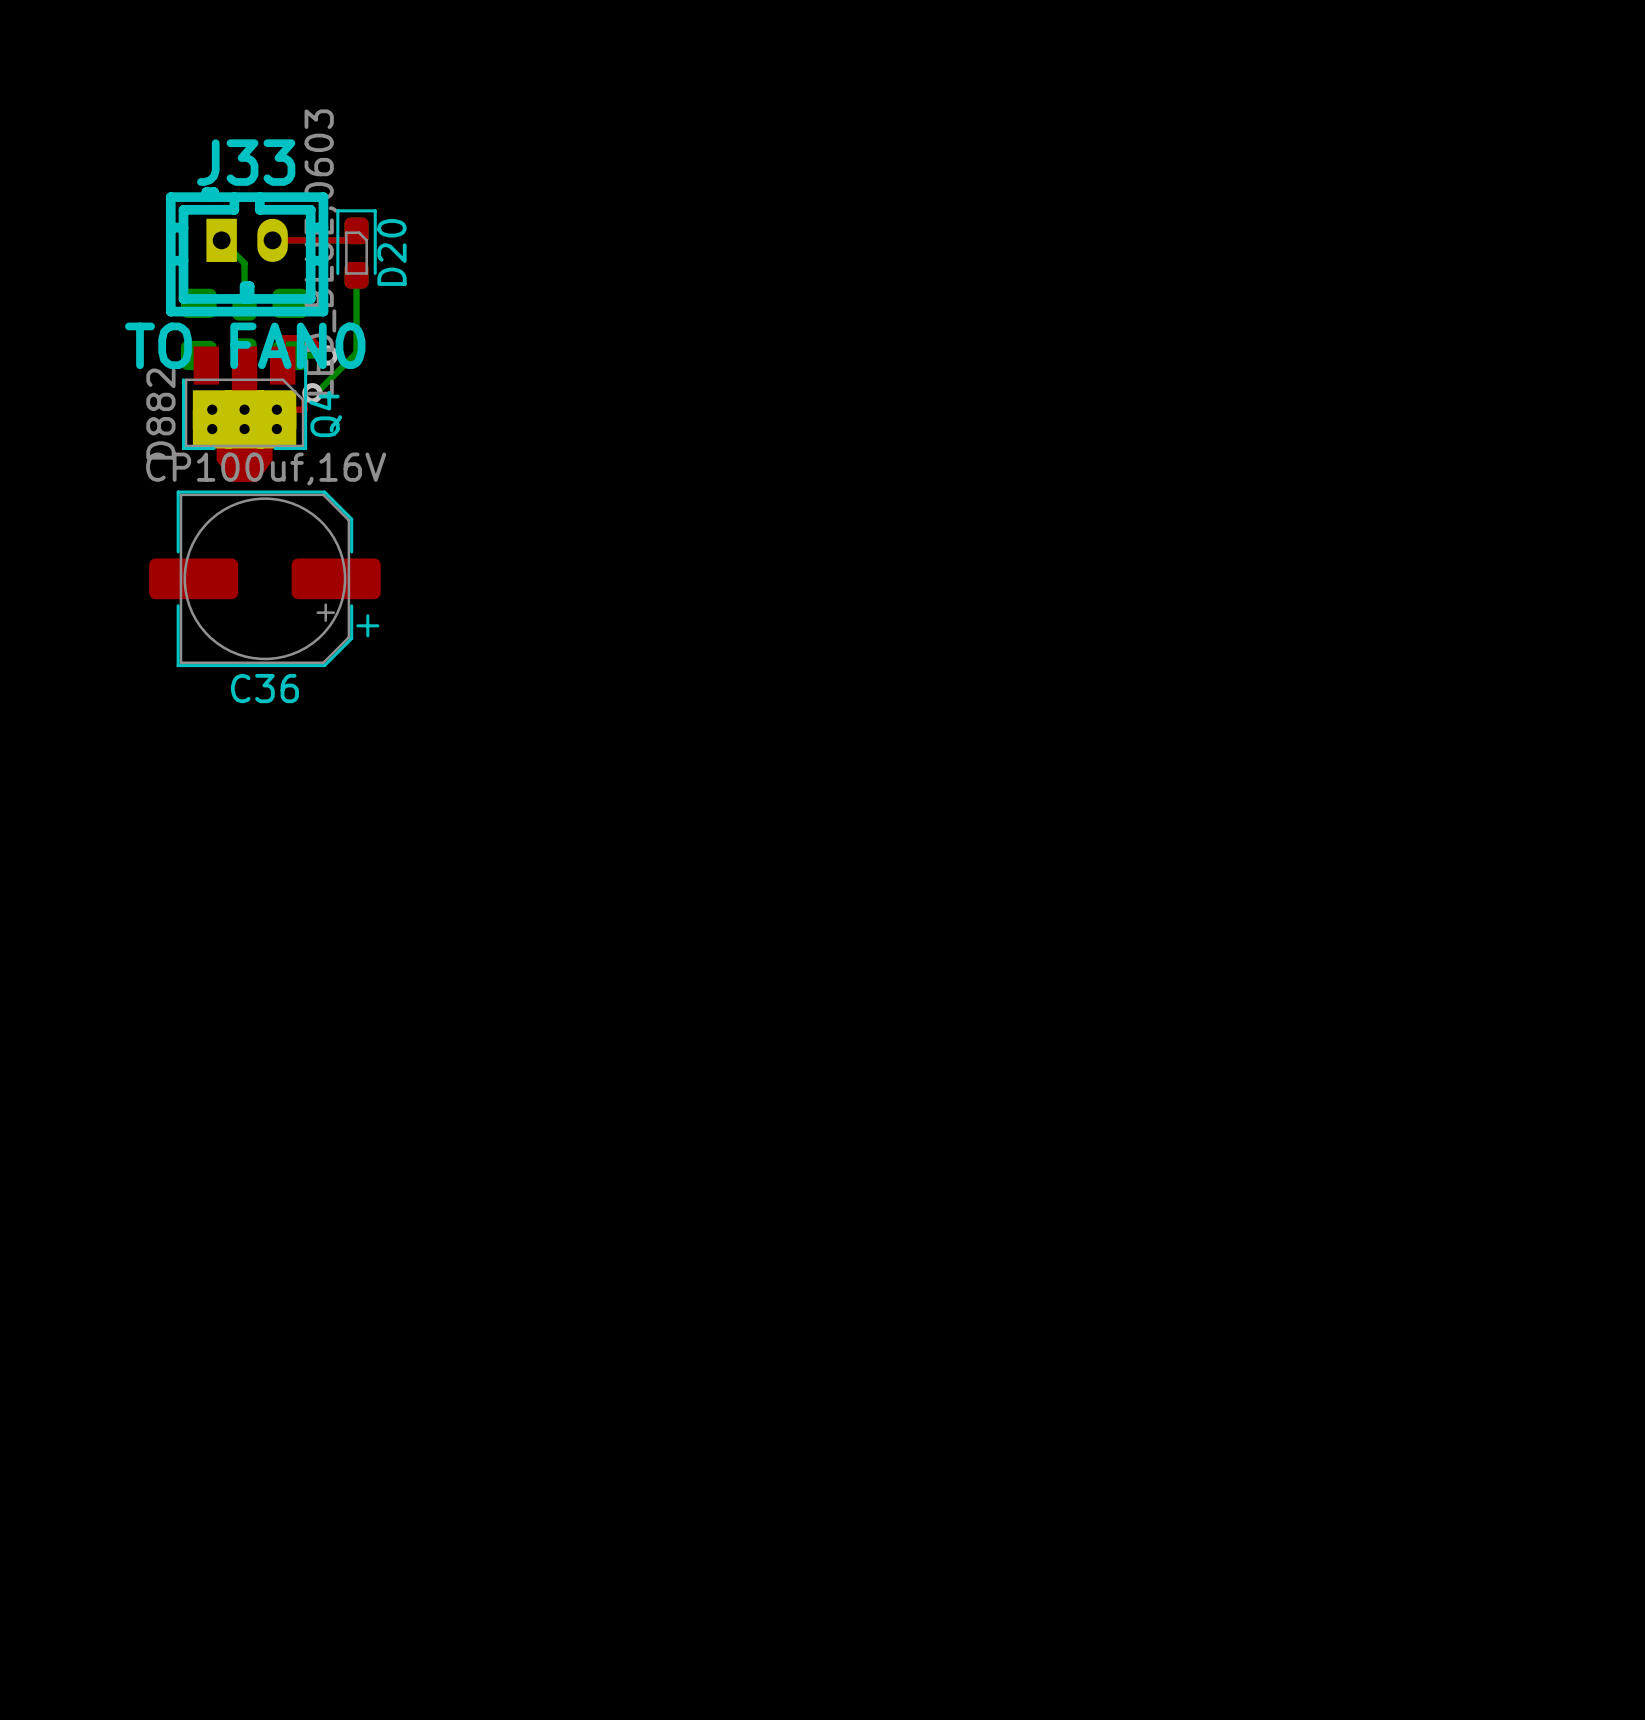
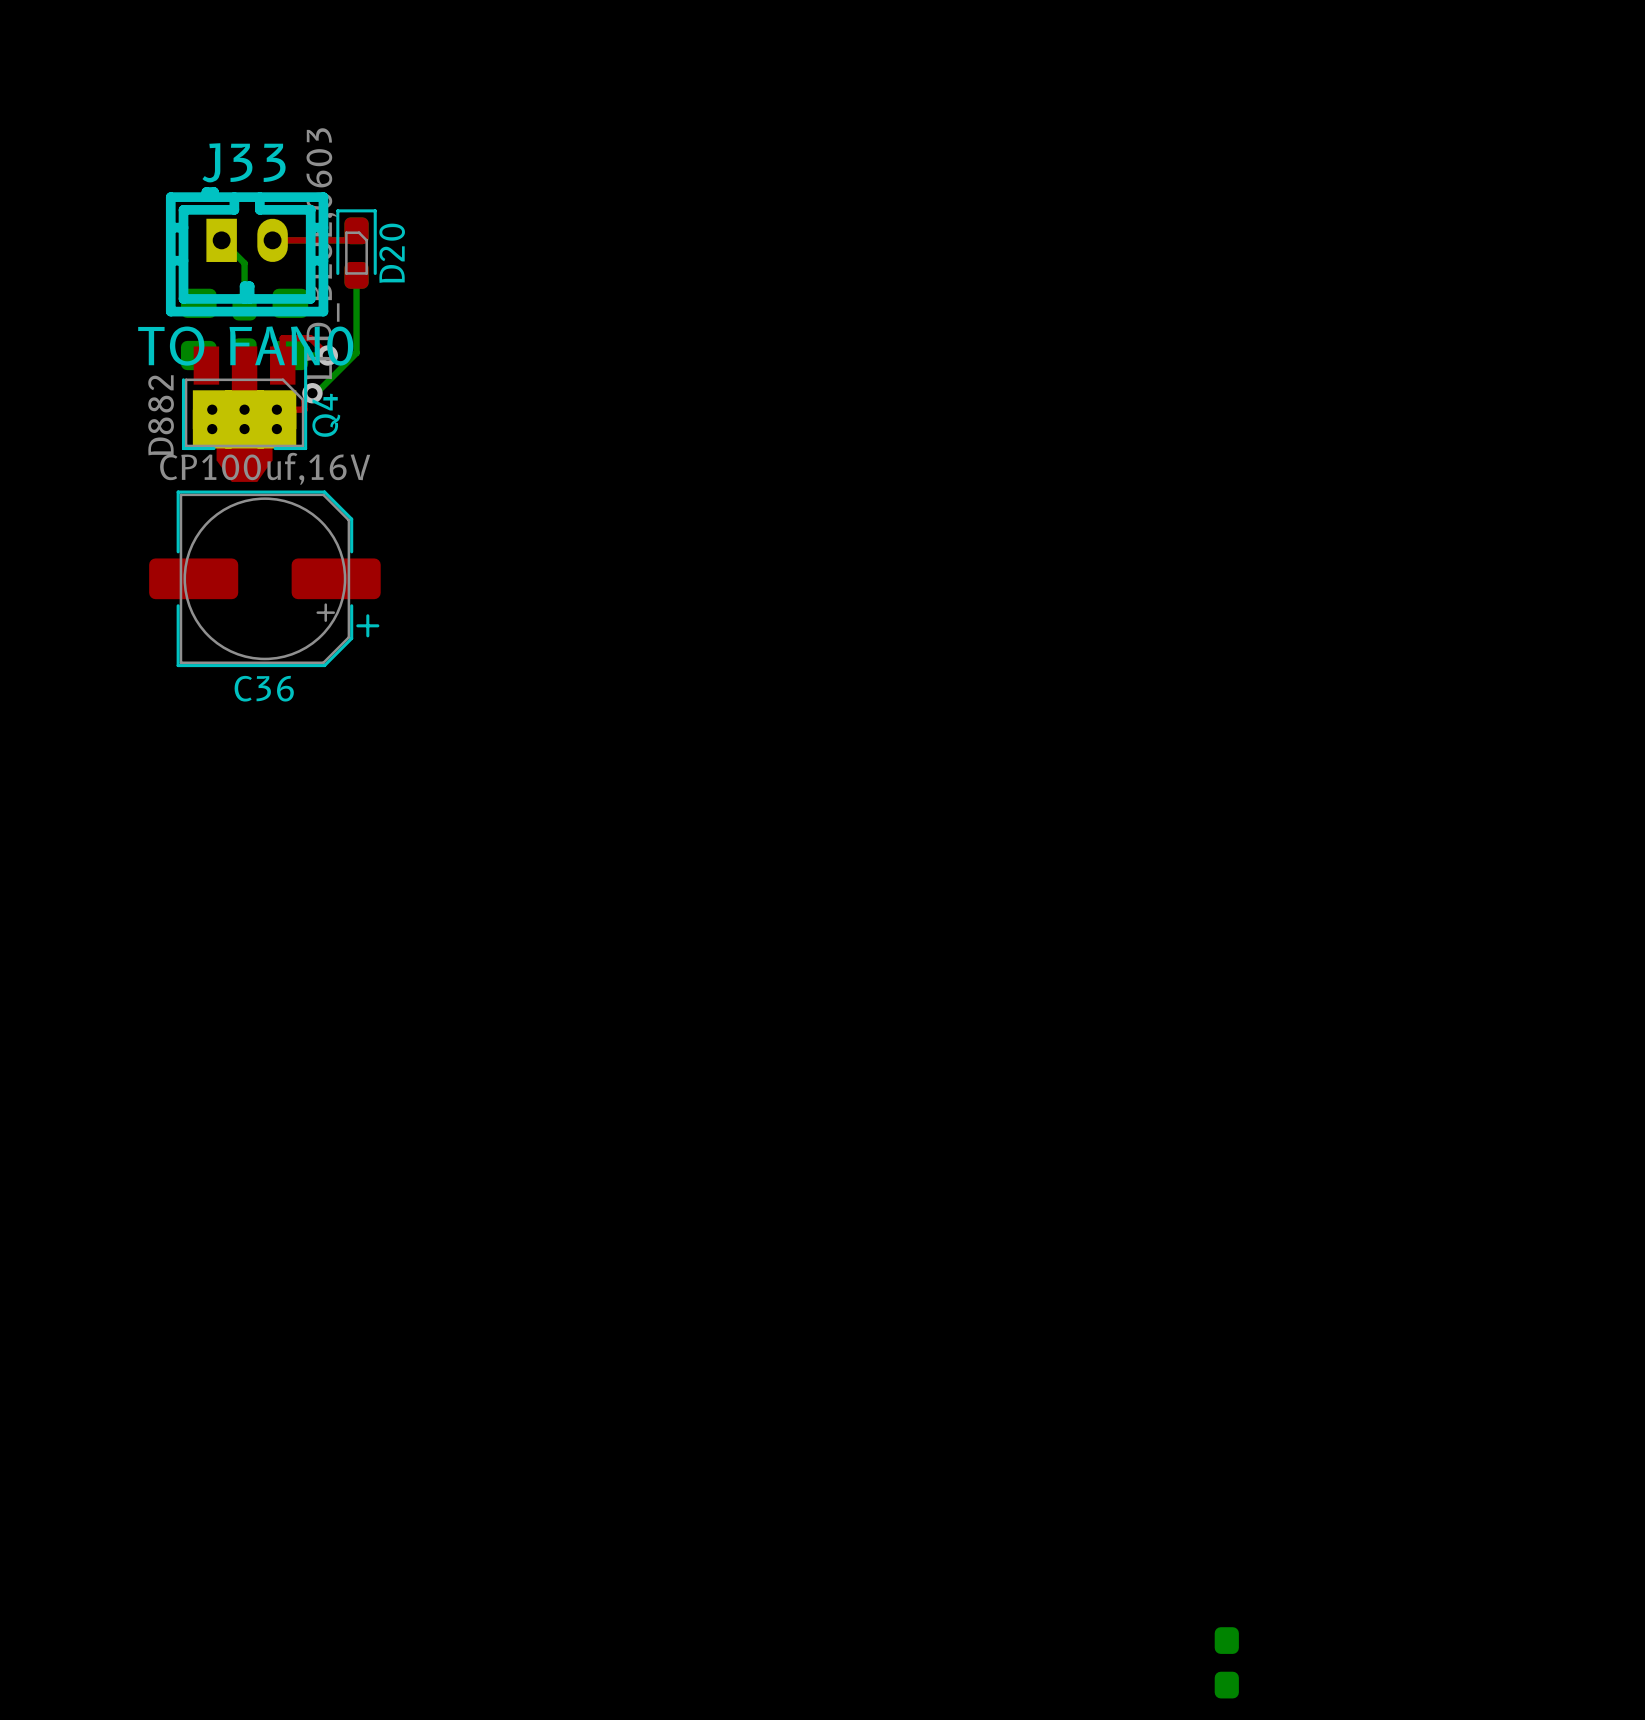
part: none -> (1226, 1662)

